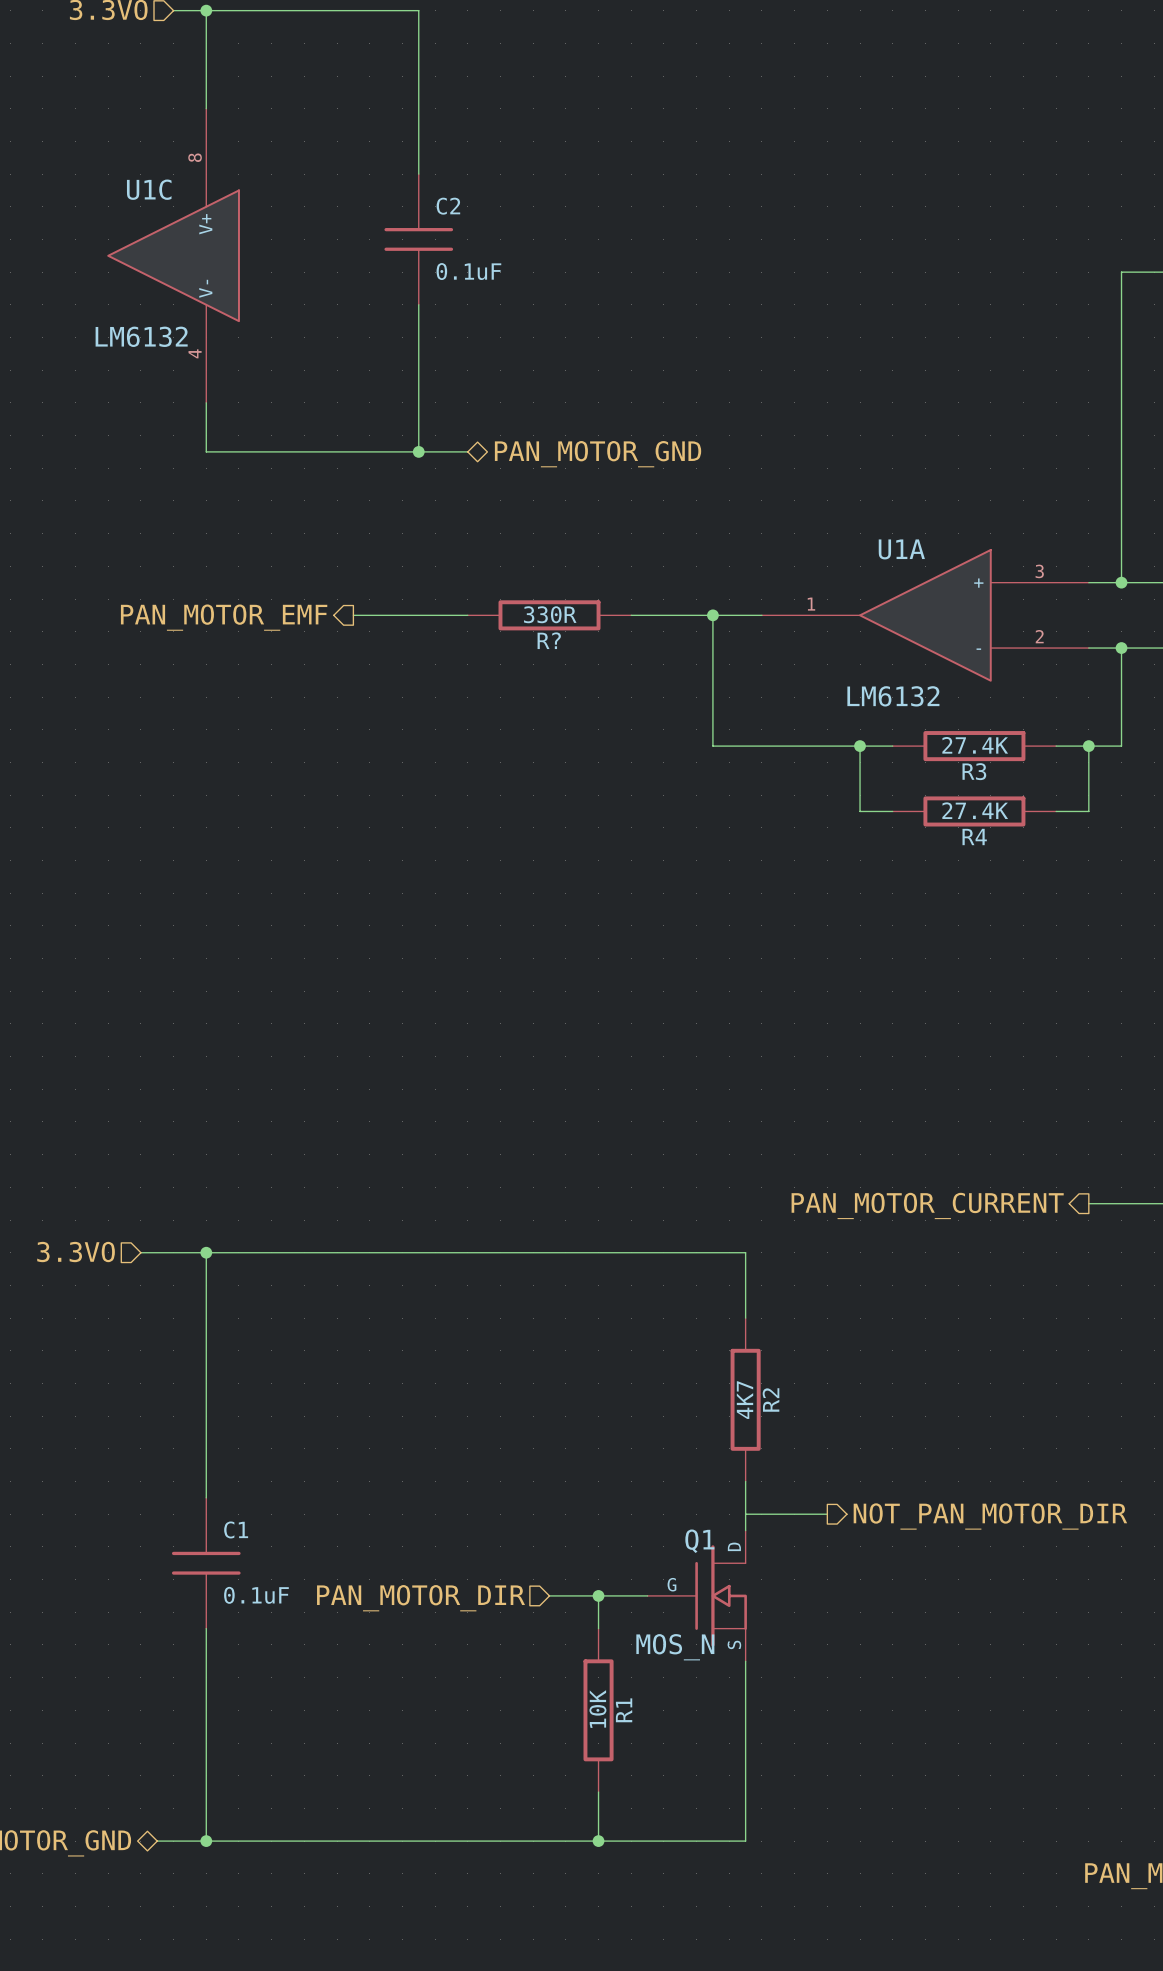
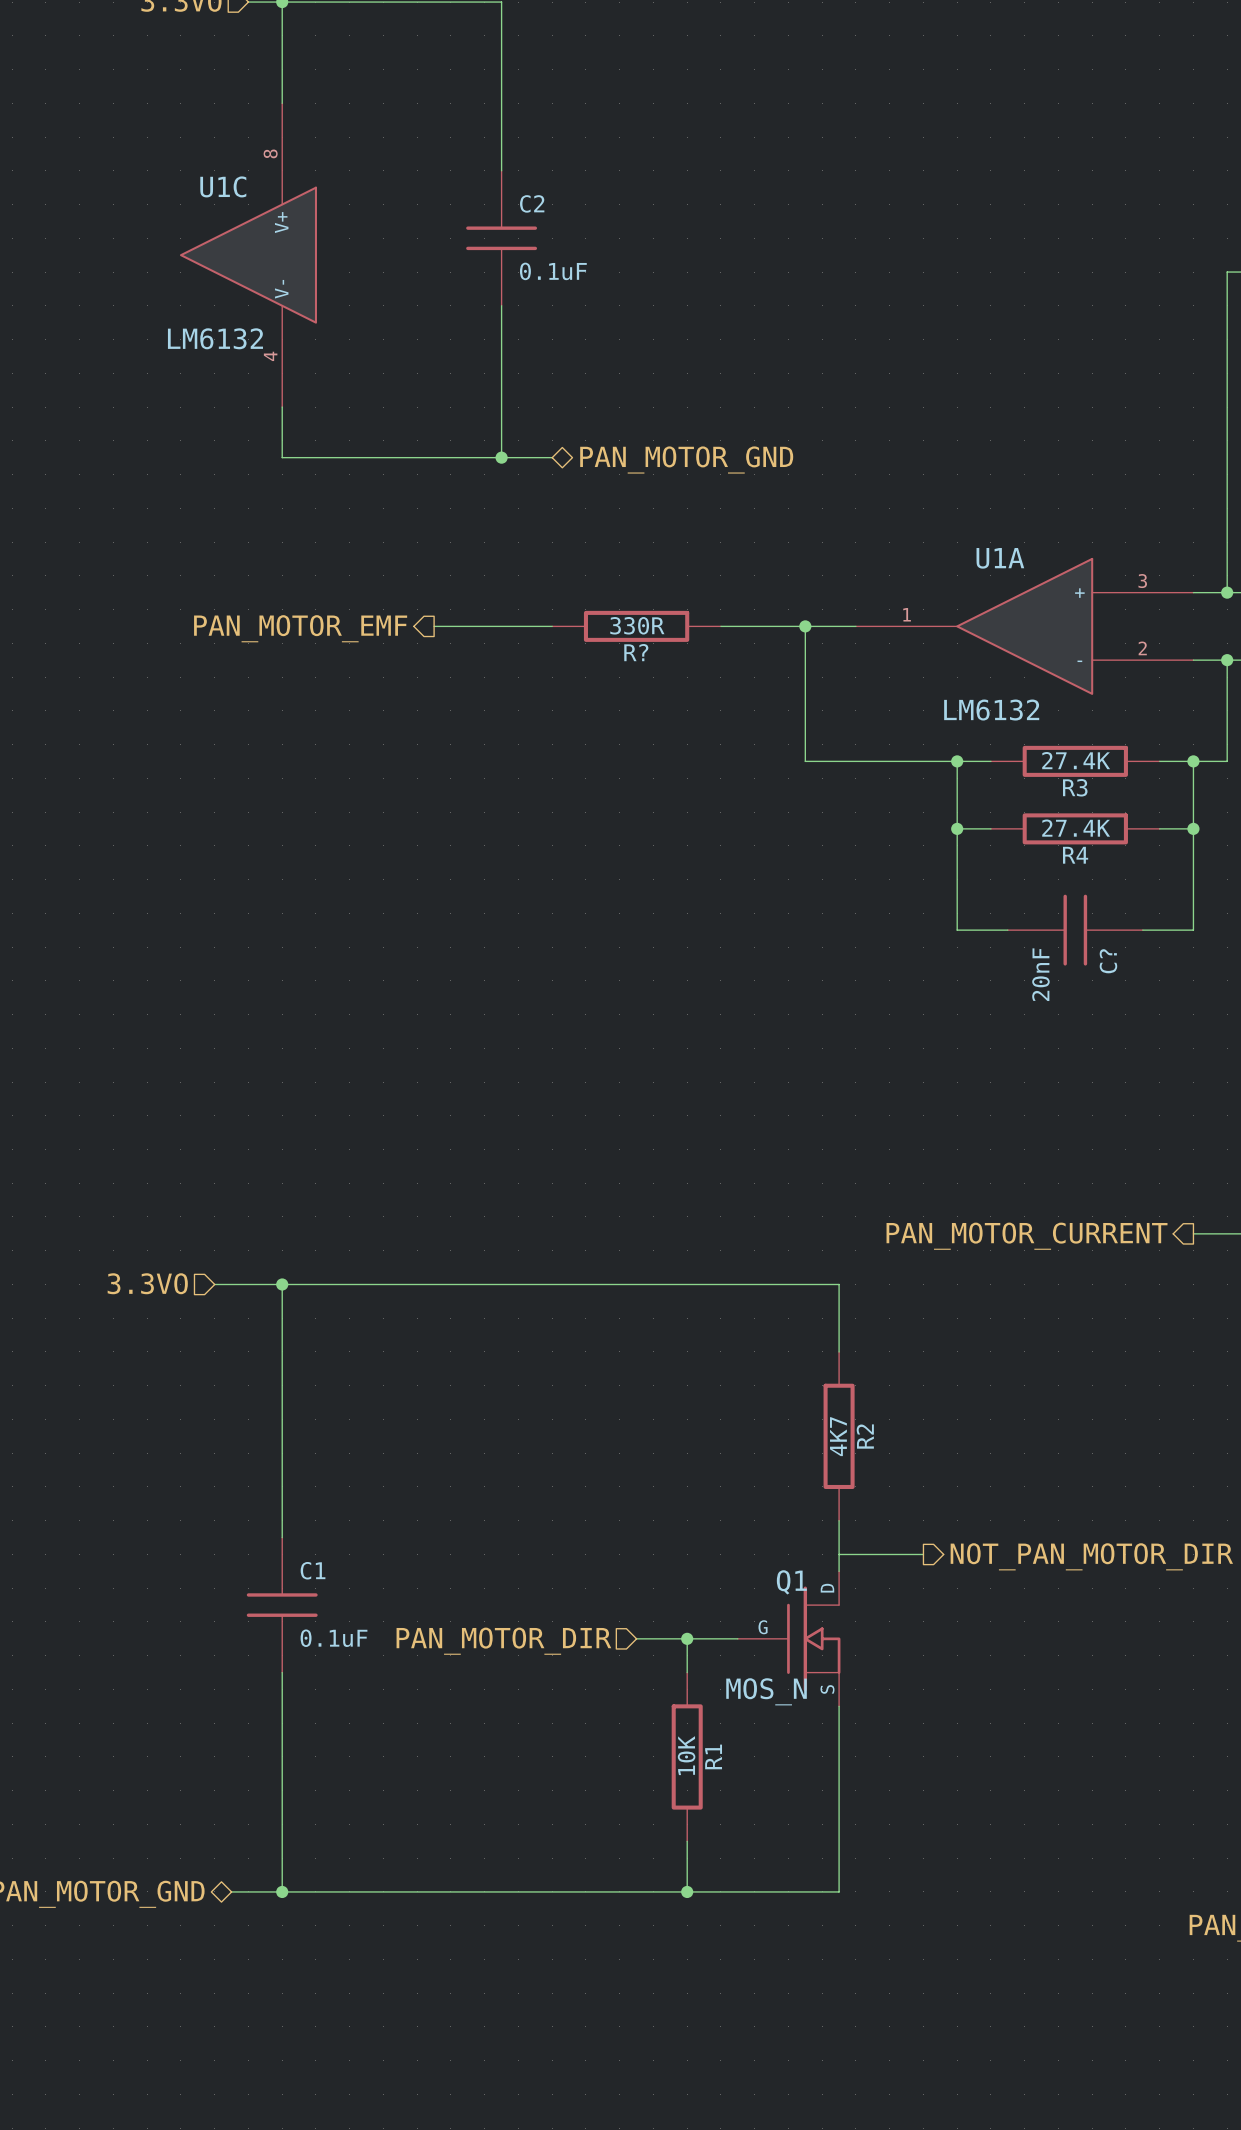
wire: none -> (957, 828) (957, 930) (1007, 930)
junction: none -> (957, 828)
wire: none -> (1193, 828) (1193, 930) (1142, 930)
junction: none -> (1193, 828)
C?: none -> 20nF (1075, 930)

